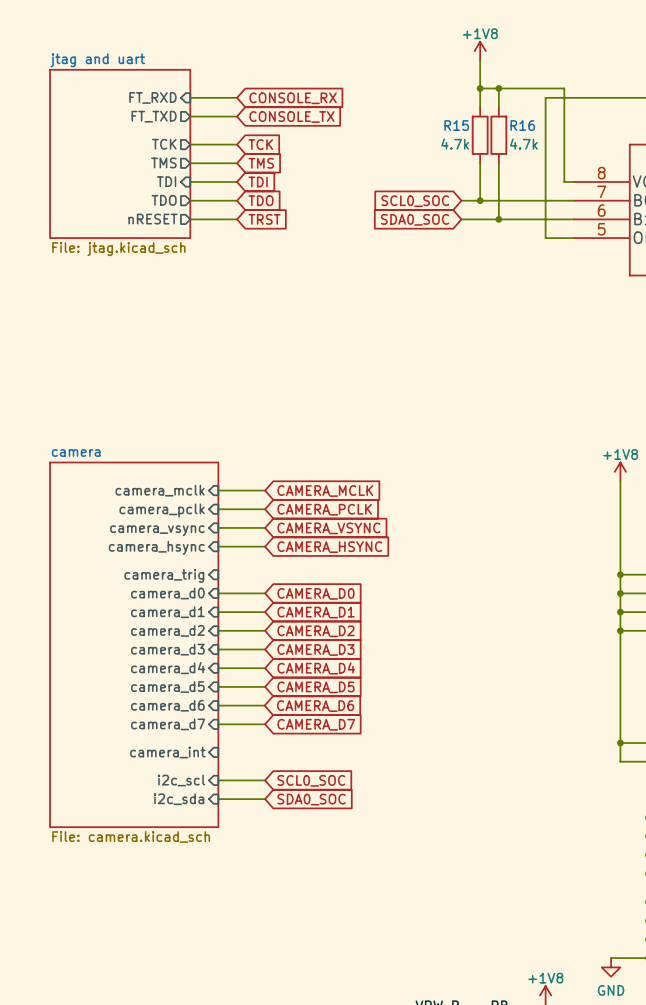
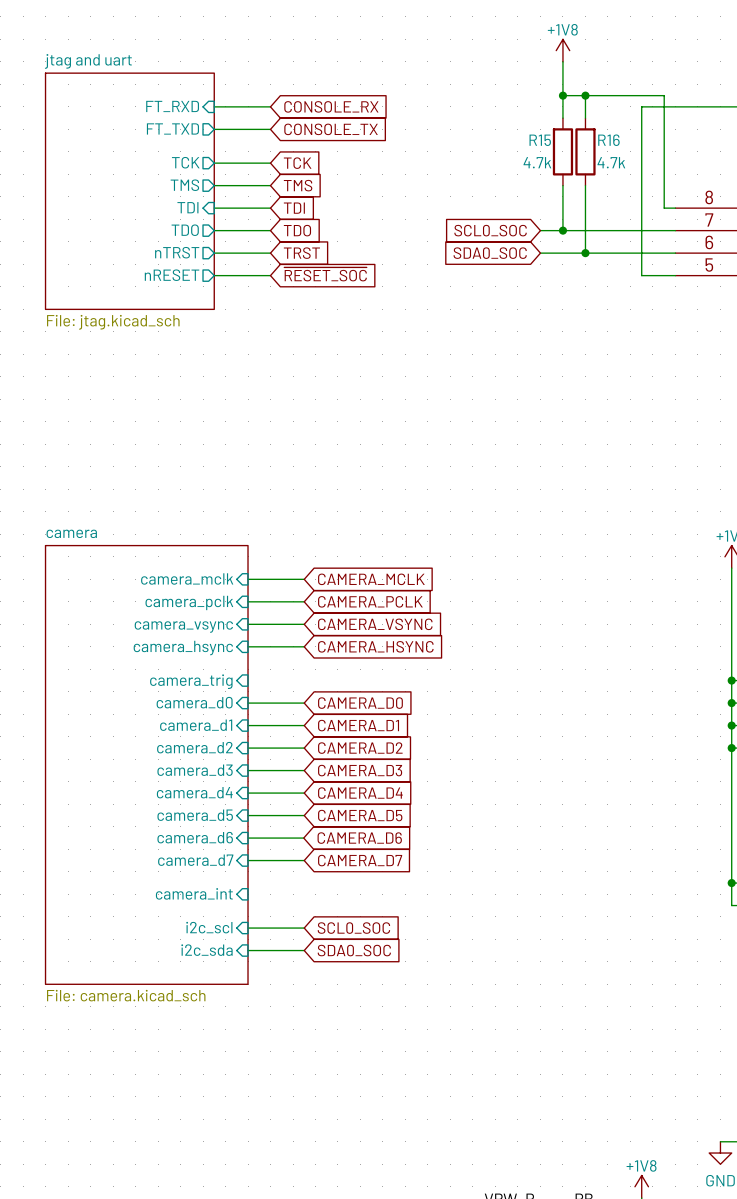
sheet jtag and uart: File: jtag.kicad_sch (120, 153) -> none
sheet jtag and uart: none -> File: jtag.kicad_sch (129, 191)
sheet pin: nRESET (152, 219) -> nTRST (177, 252)
sheet pin: none -> nRESET (172, 275)
global label: none -> ~{RESET_SOC} (325, 274)
wire: none -> (214, 275) (270, 275)

